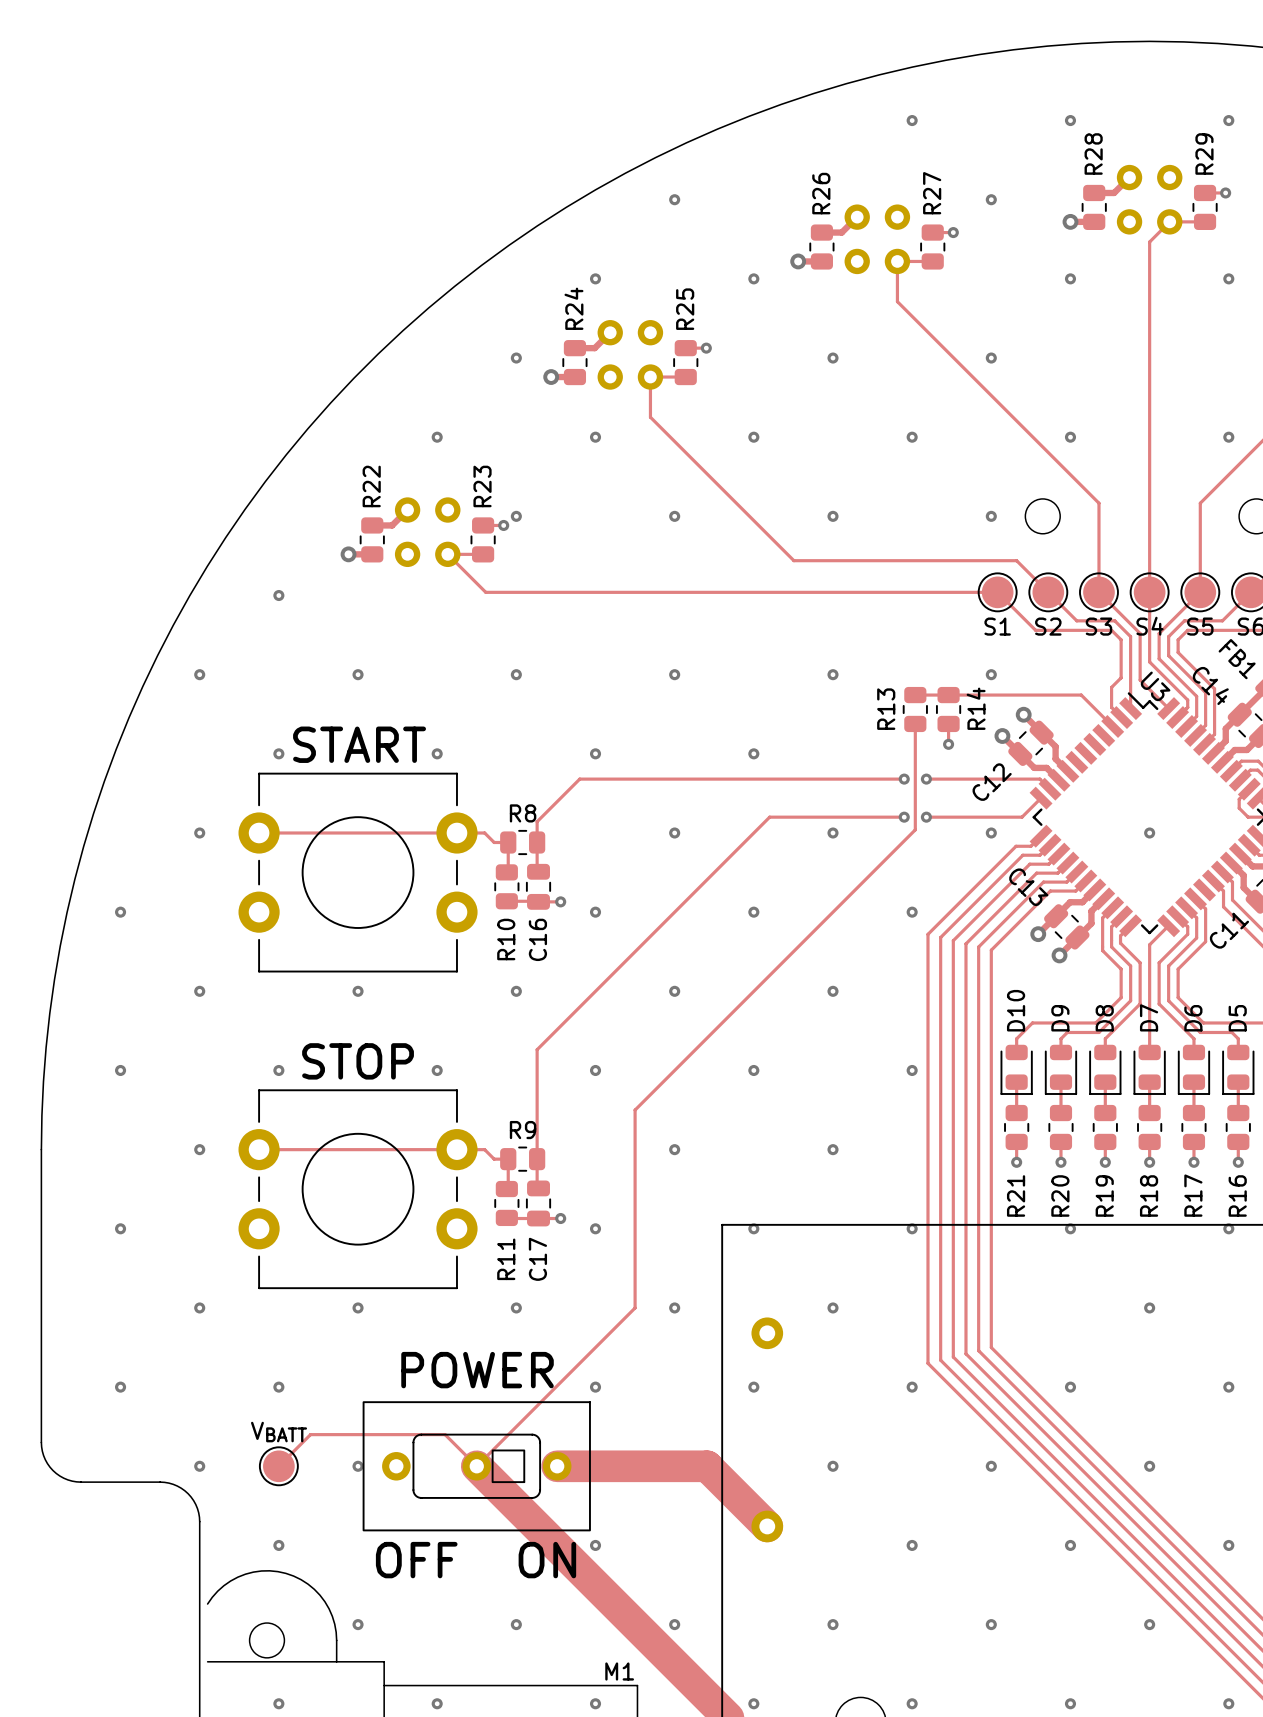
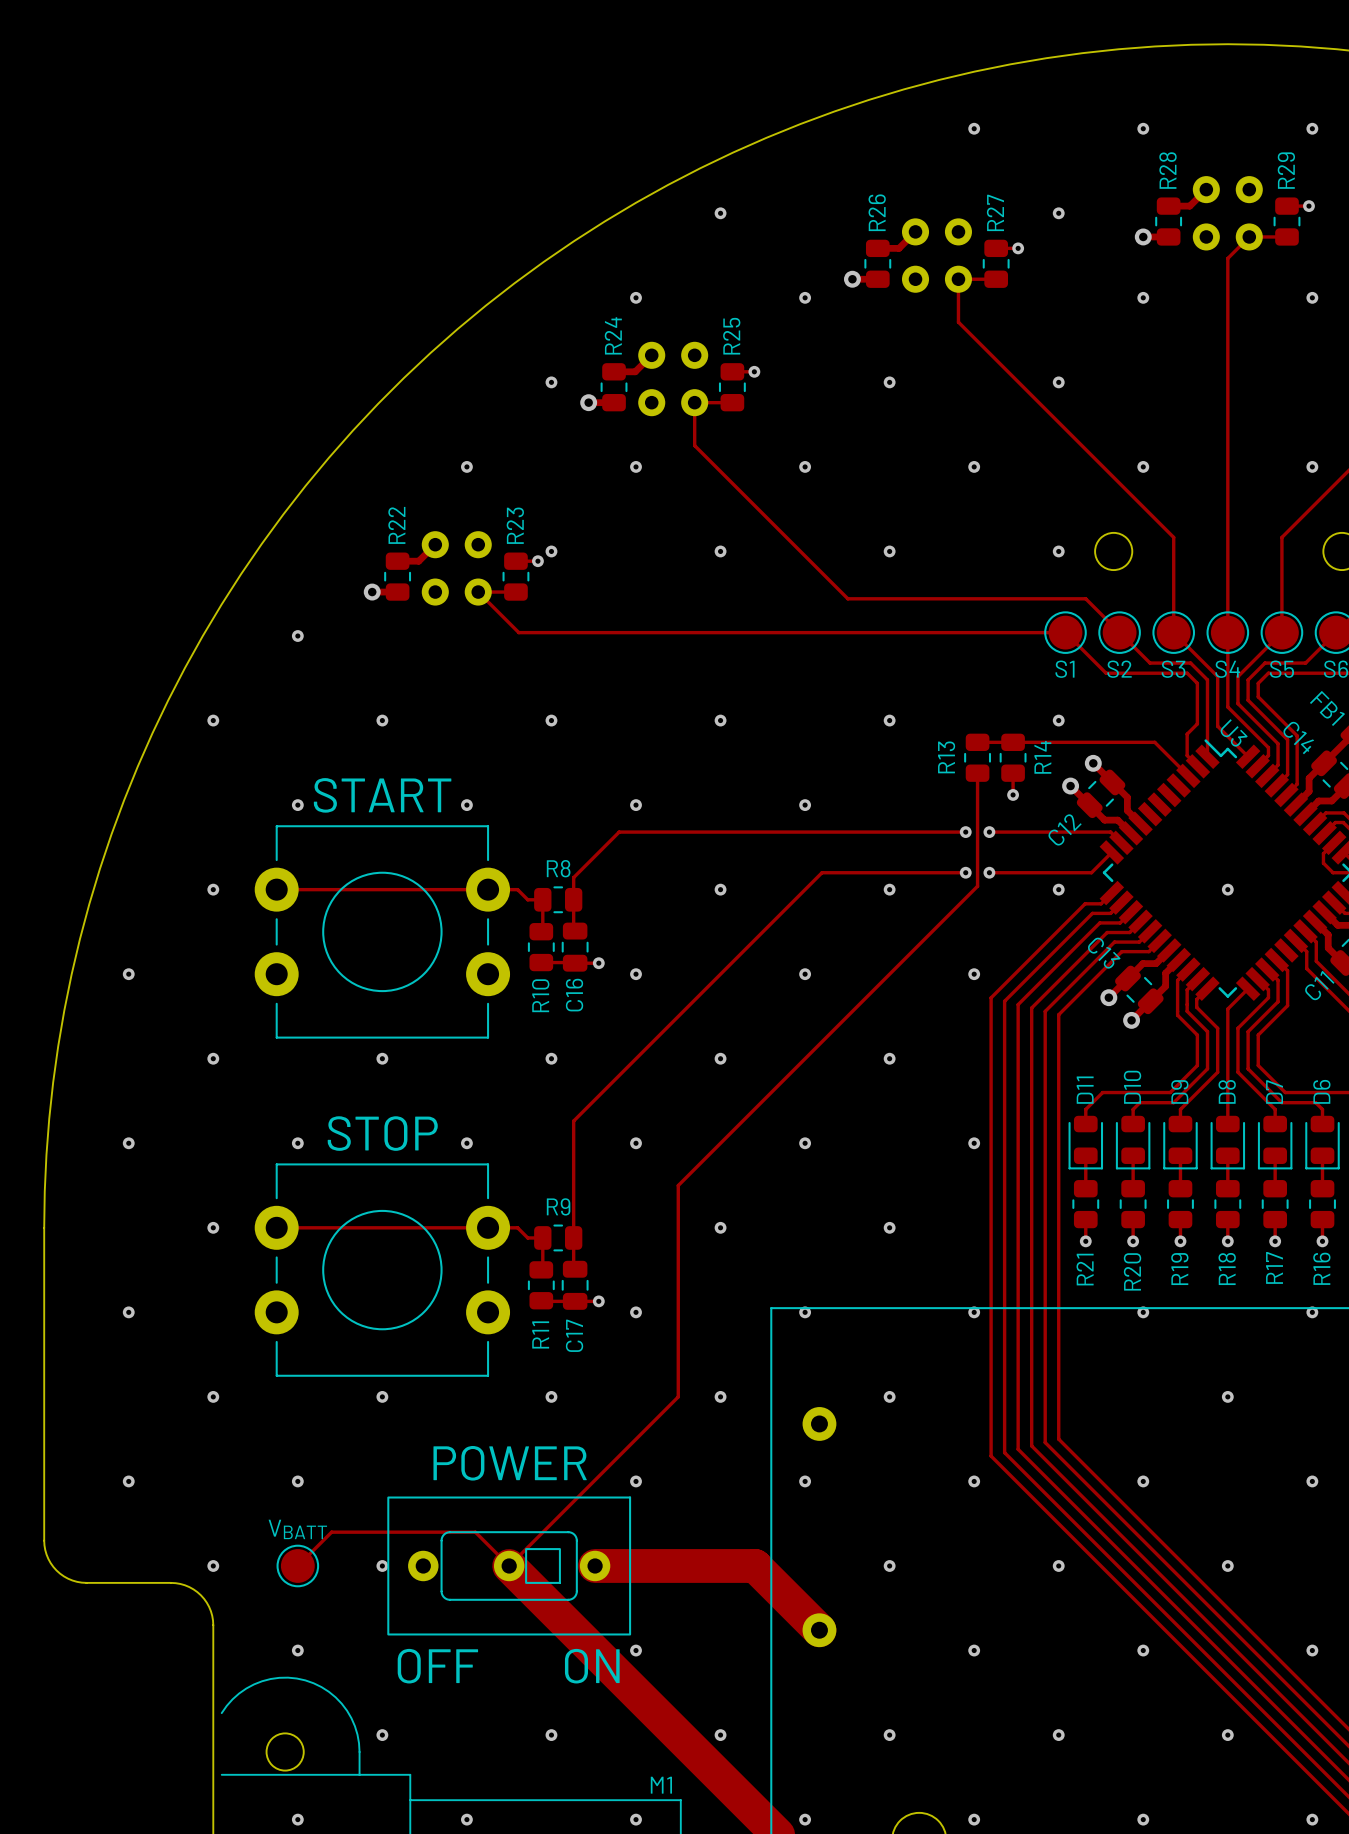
D10 name: D10 (1016, 1010) -> D11 (1085, 1090)
D7 name: D7 (1149, 1017) -> D8 (1227, 1091)
D9 name: D9 (1060, 1018) -> D10 (1132, 1087)
D8 name: D8 (1104, 1018) -> D9 (1179, 1091)
D6 name: D6 (1193, 1018) -> D7 (1274, 1092)
D5 name: D5 (1237, 1018) -> D6 (1321, 1091)

